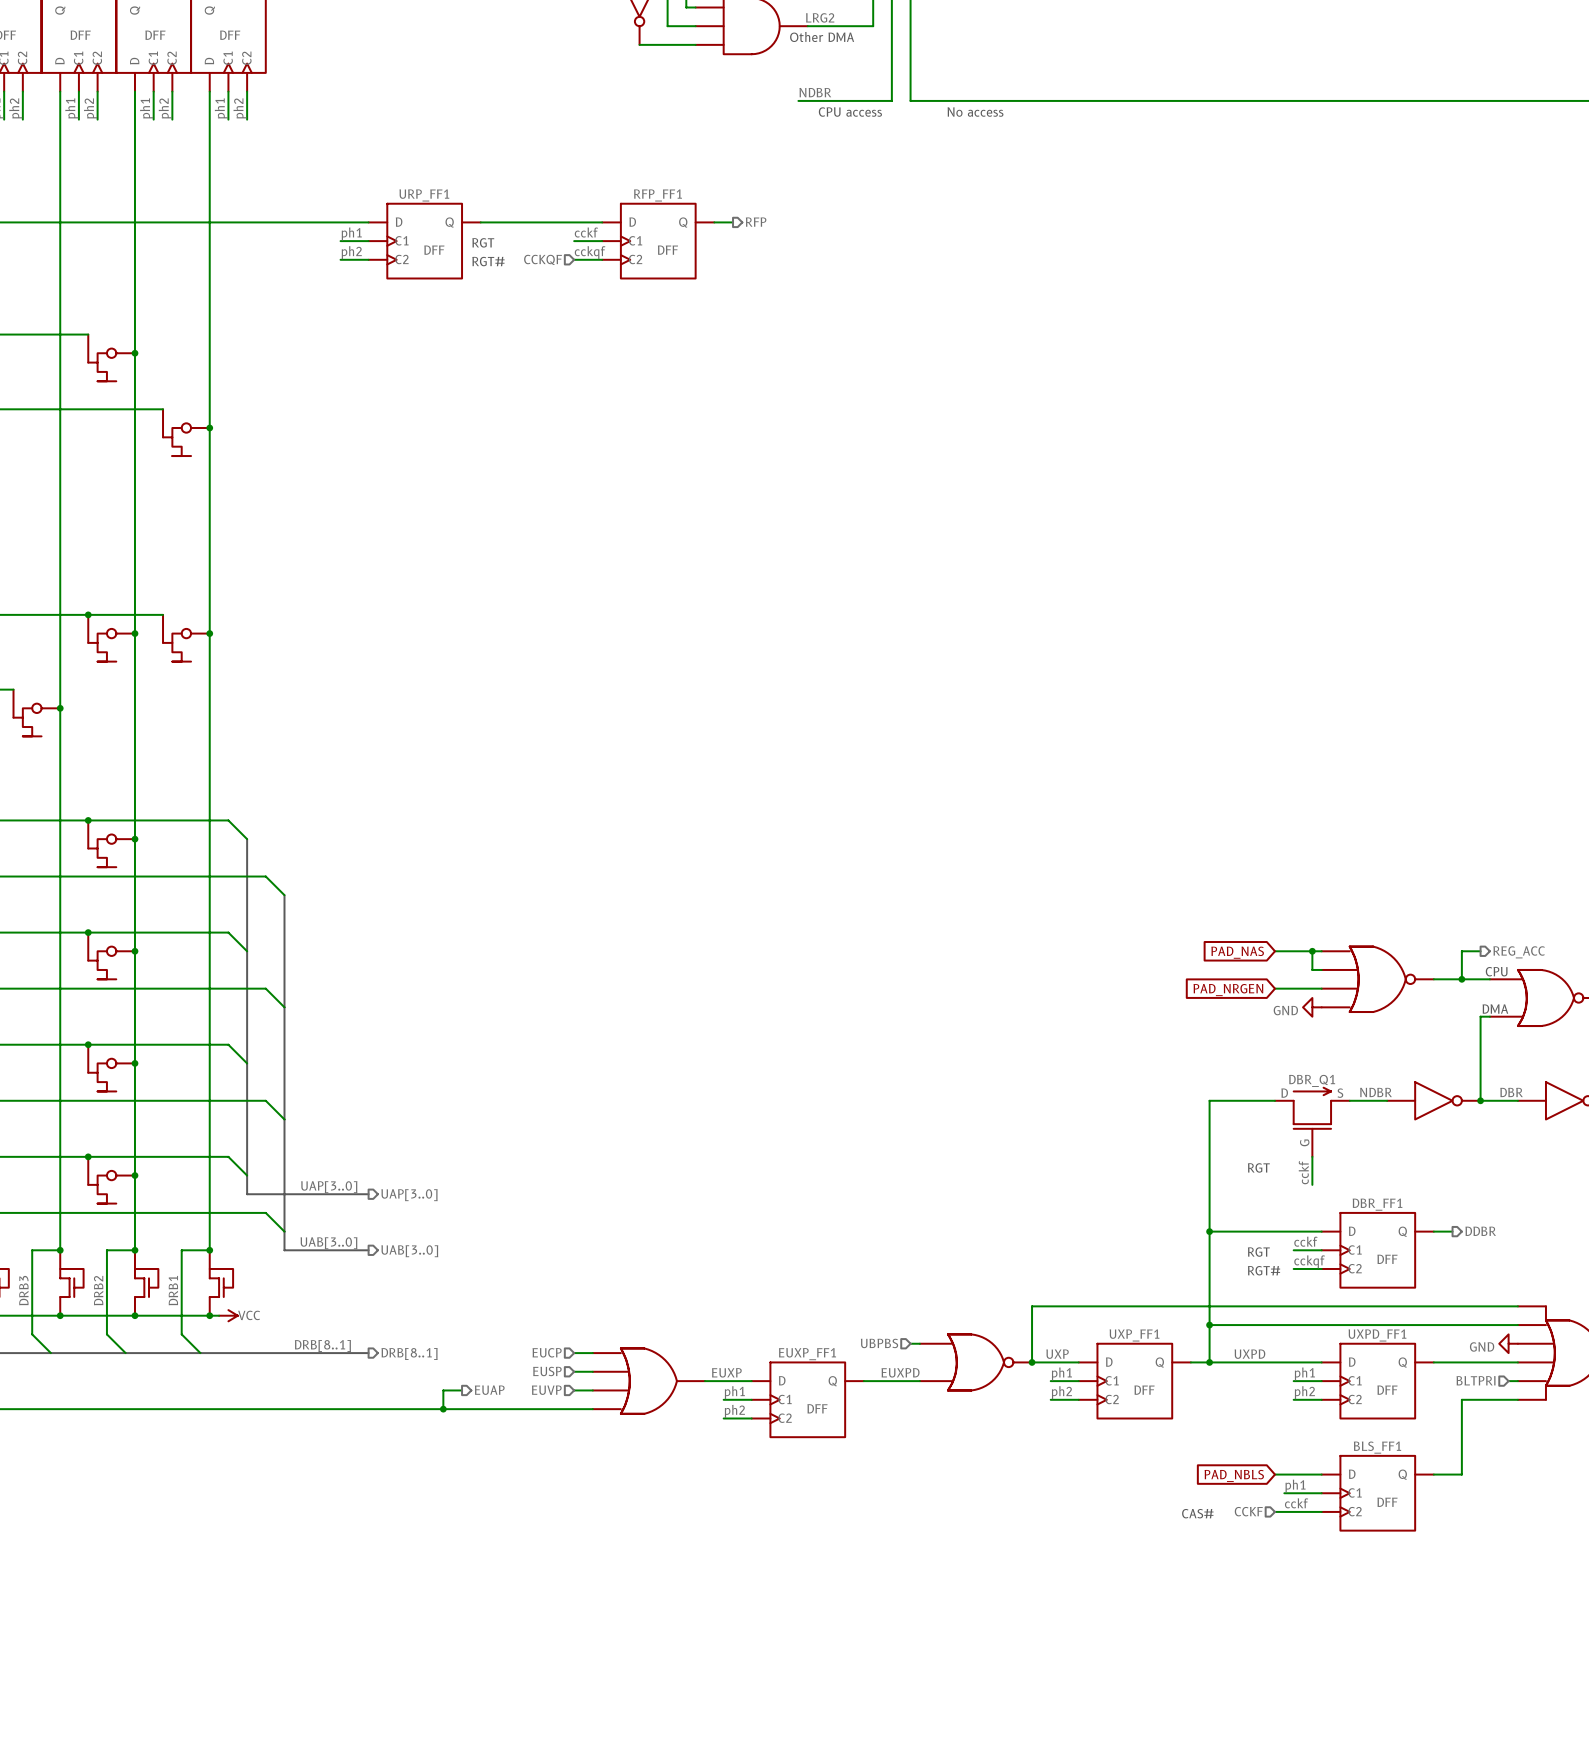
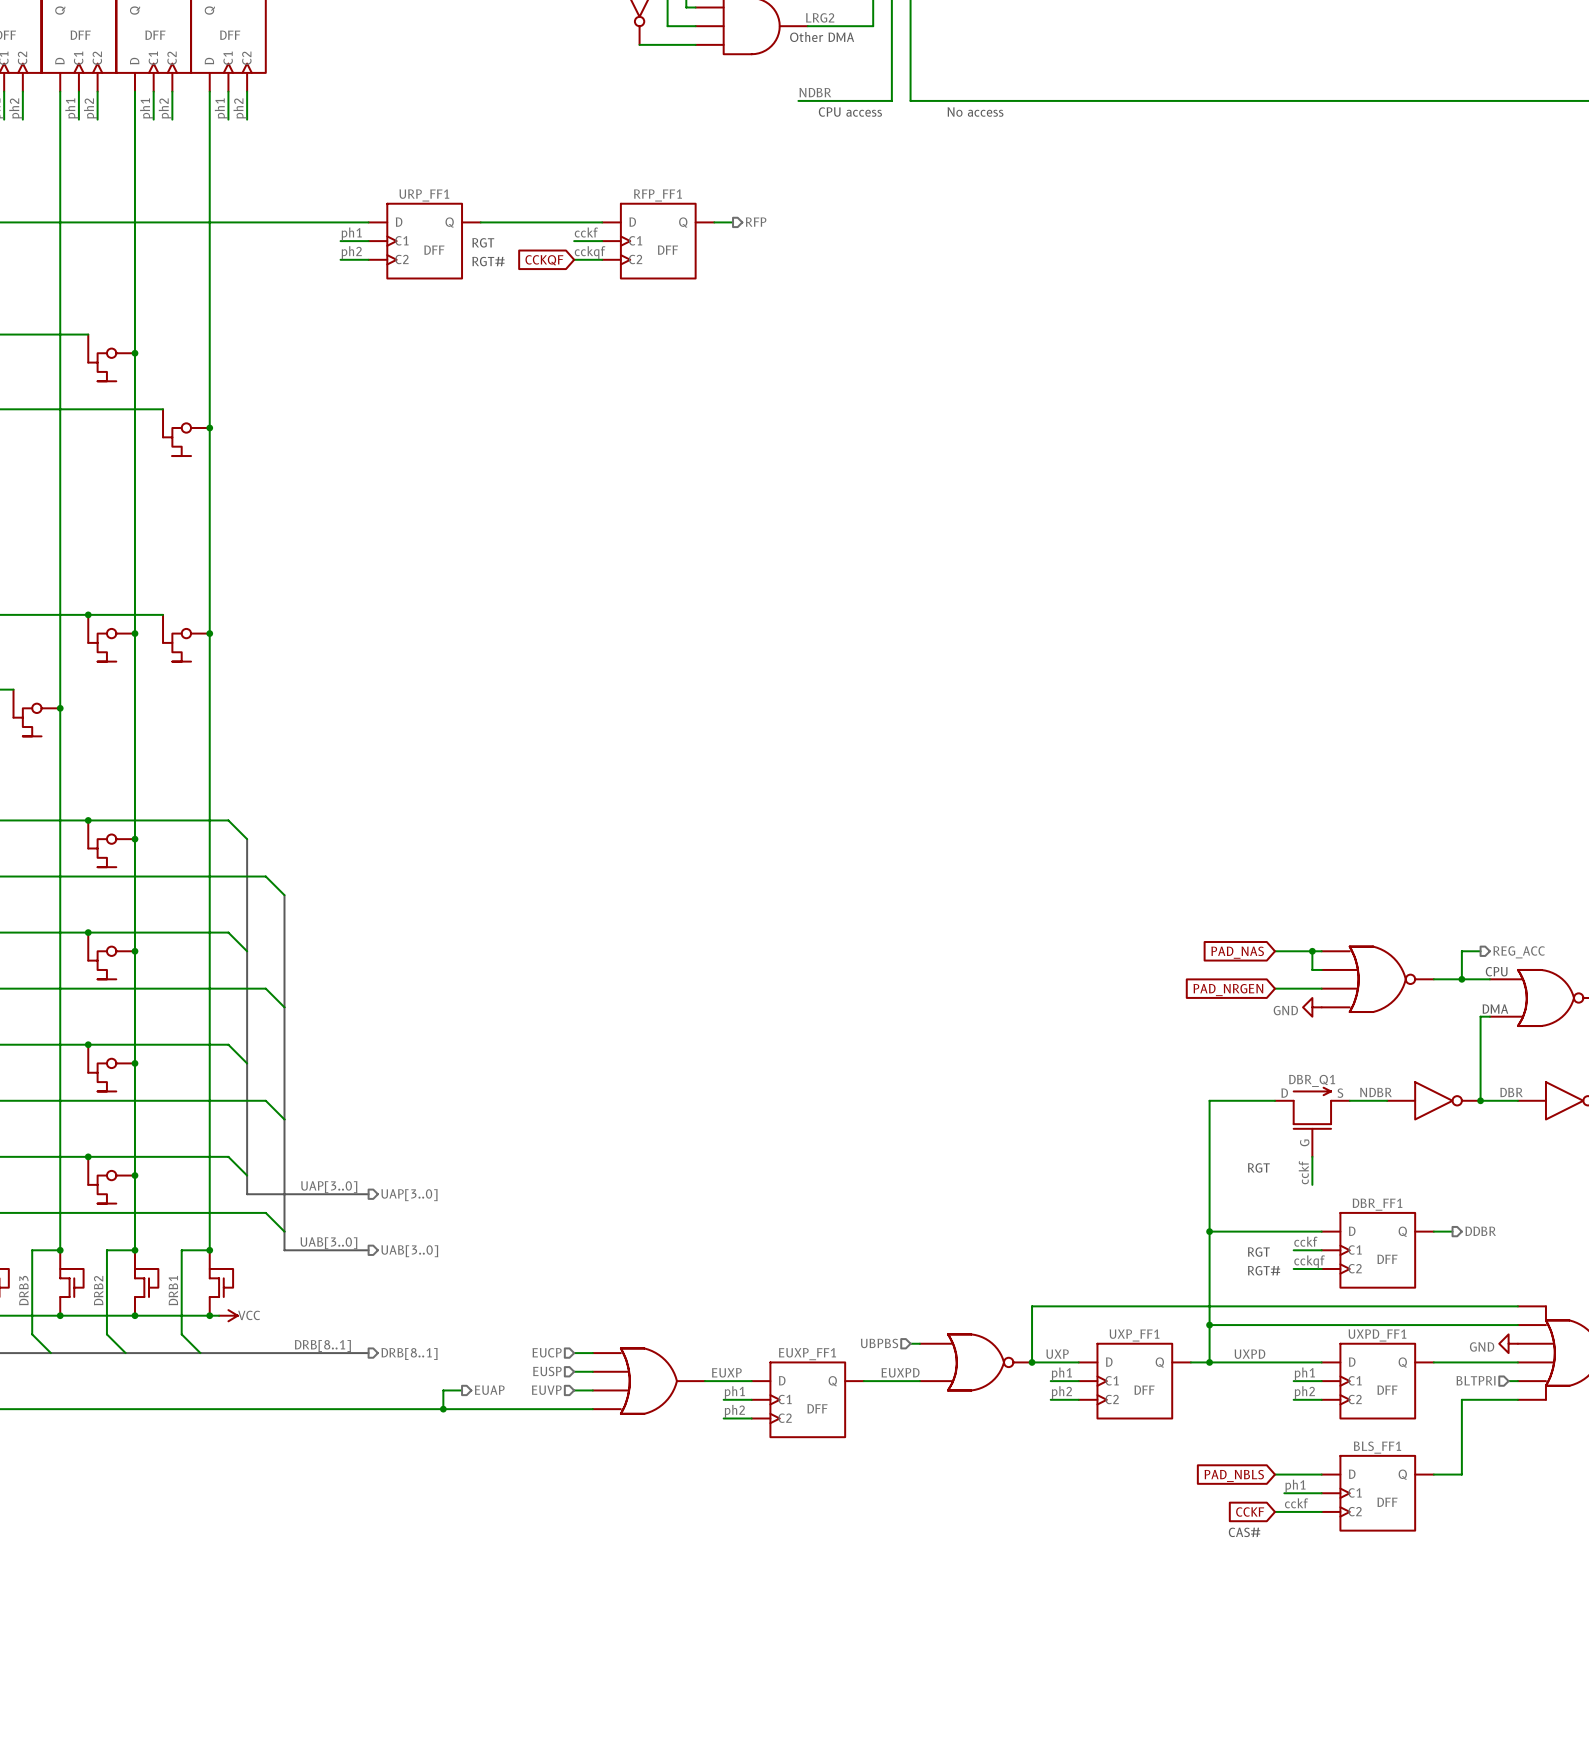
hierarchical label: CCKQF (543, 259) -> none
global label: none -> CCKQF (544, 260)
hierarchical label: CCKF (1248, 1511) -> none
global label: none -> CCKF (1250, 1511)
text position: CAS# (1197, 1513) -> CAS# (1244, 1532)

